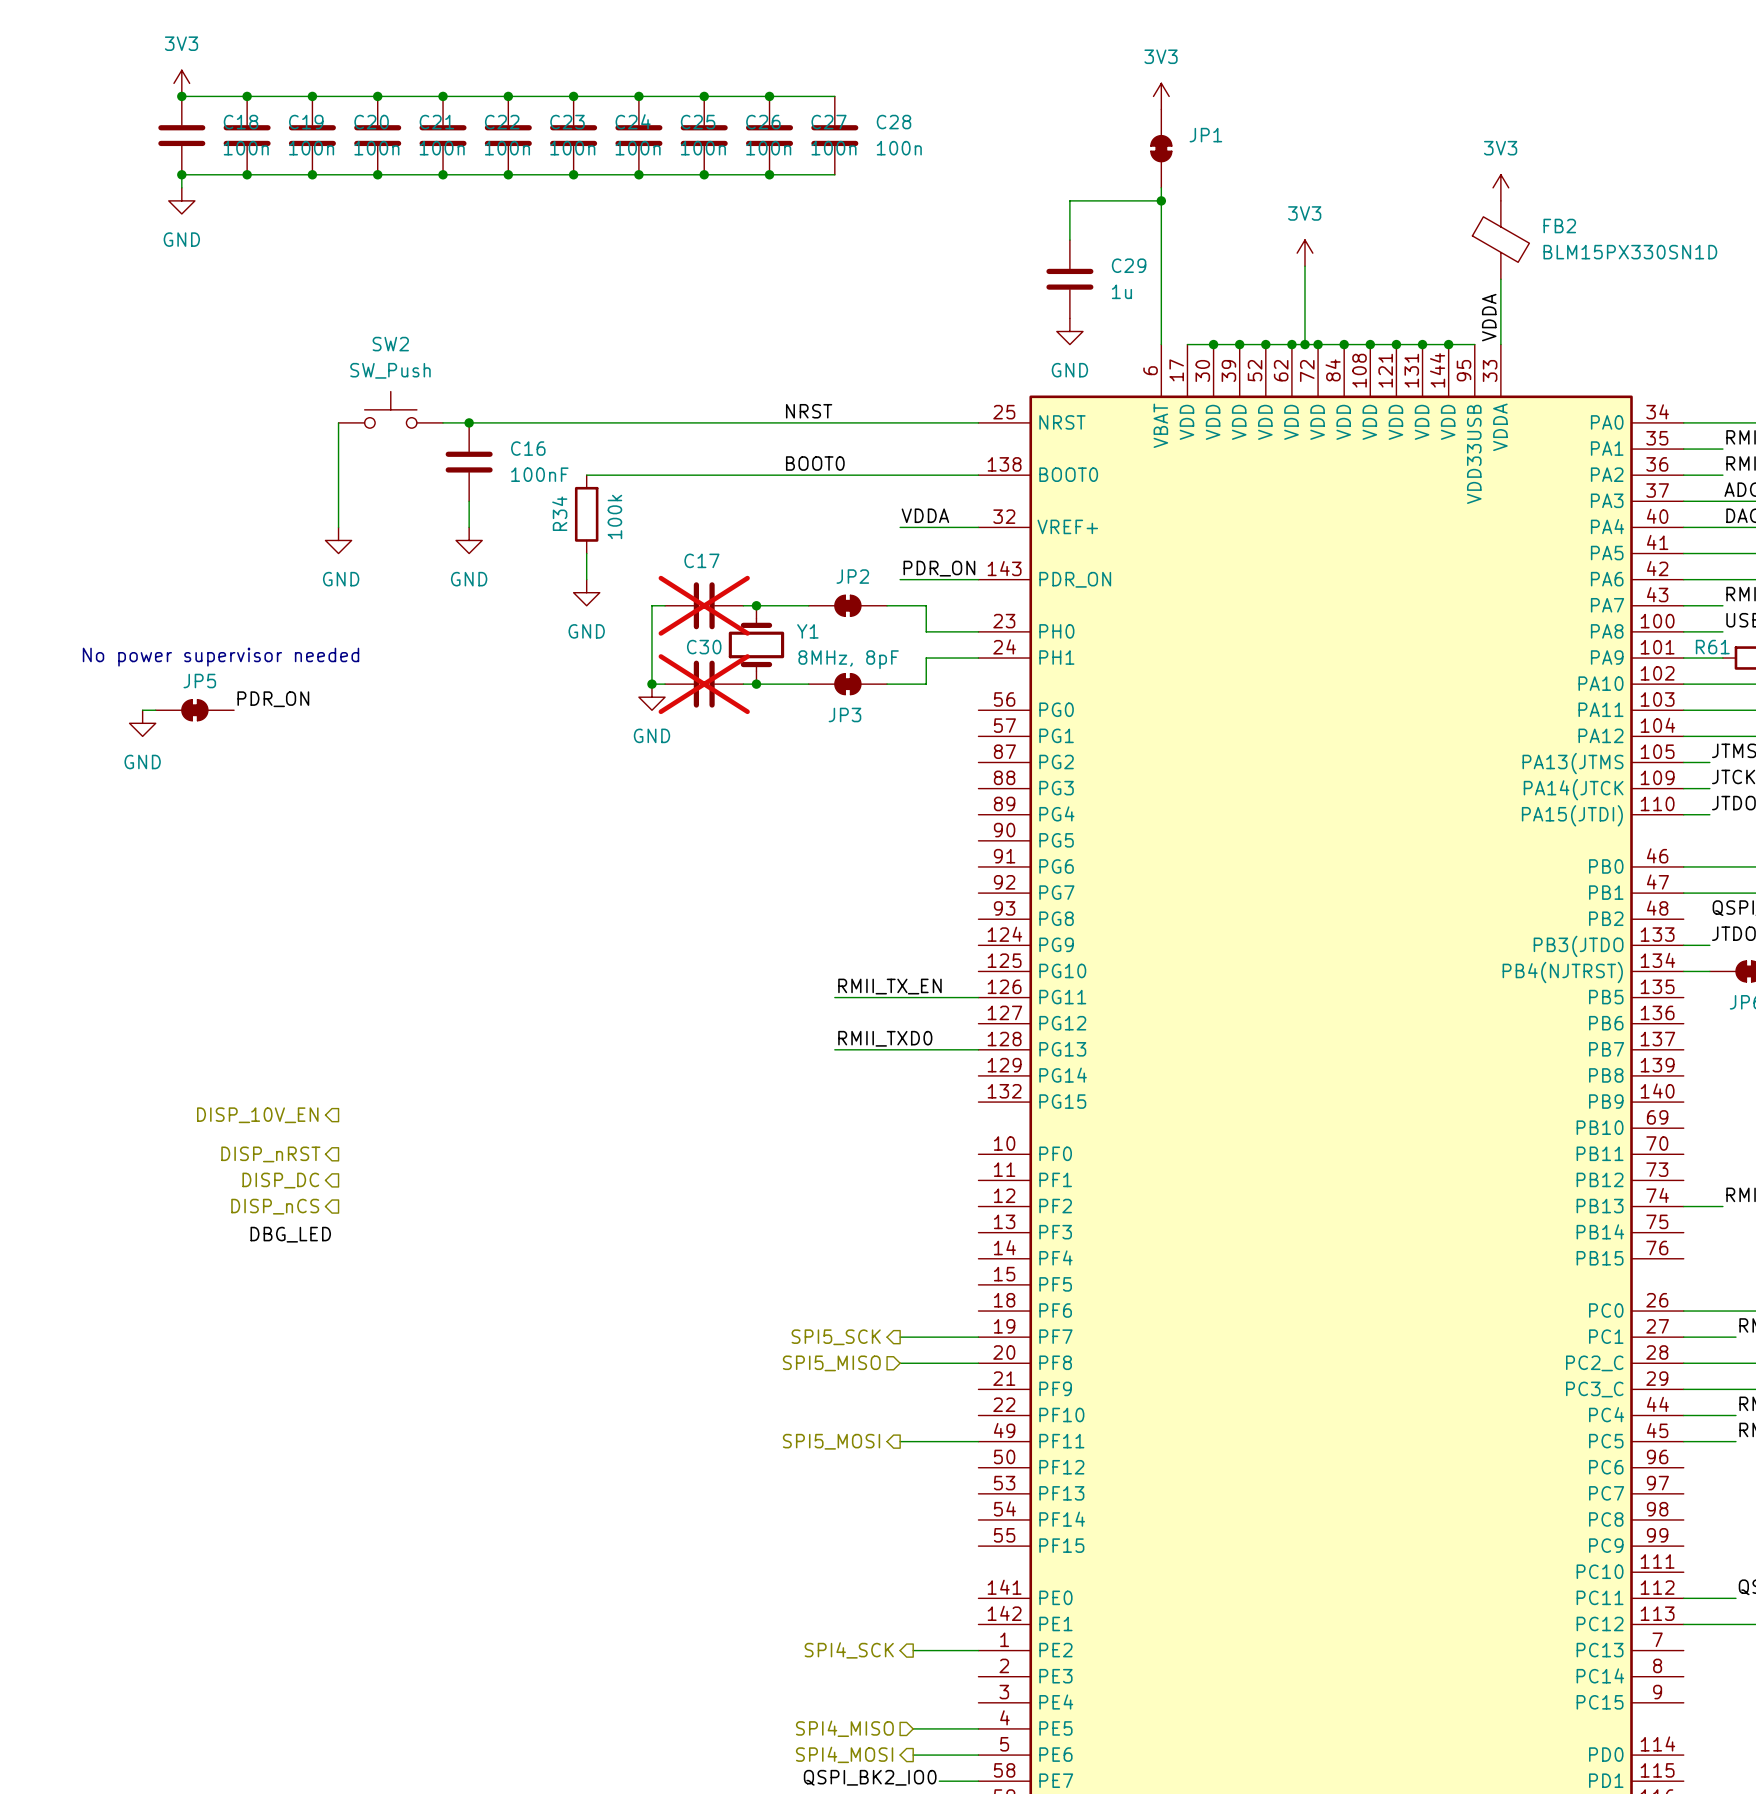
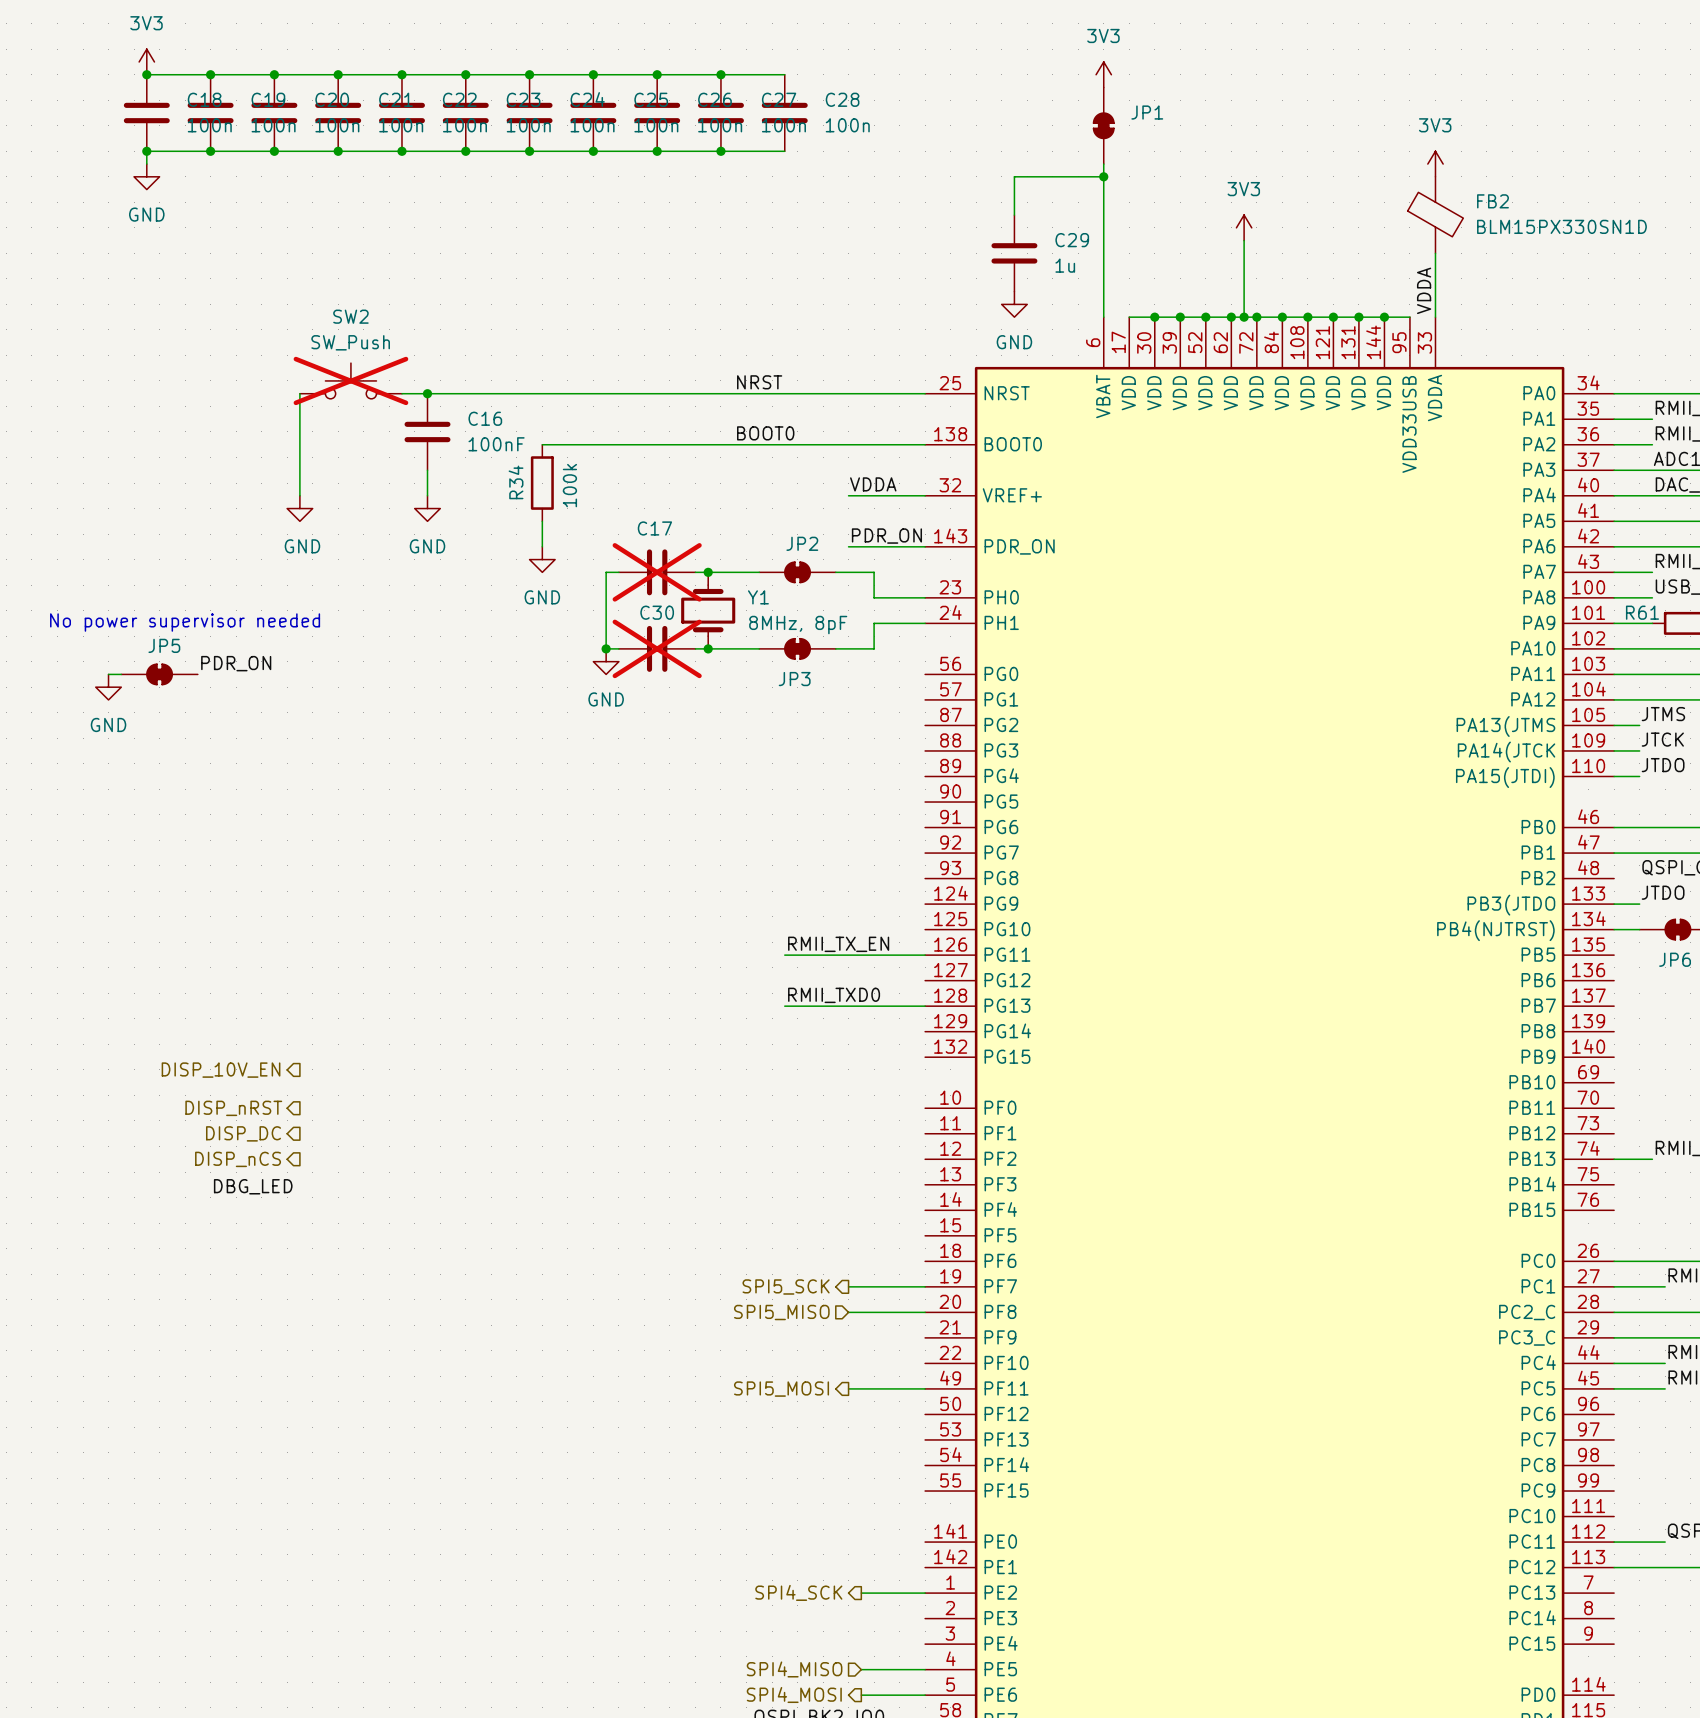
SW2 do-not-place cross: none -> (350, 380)

